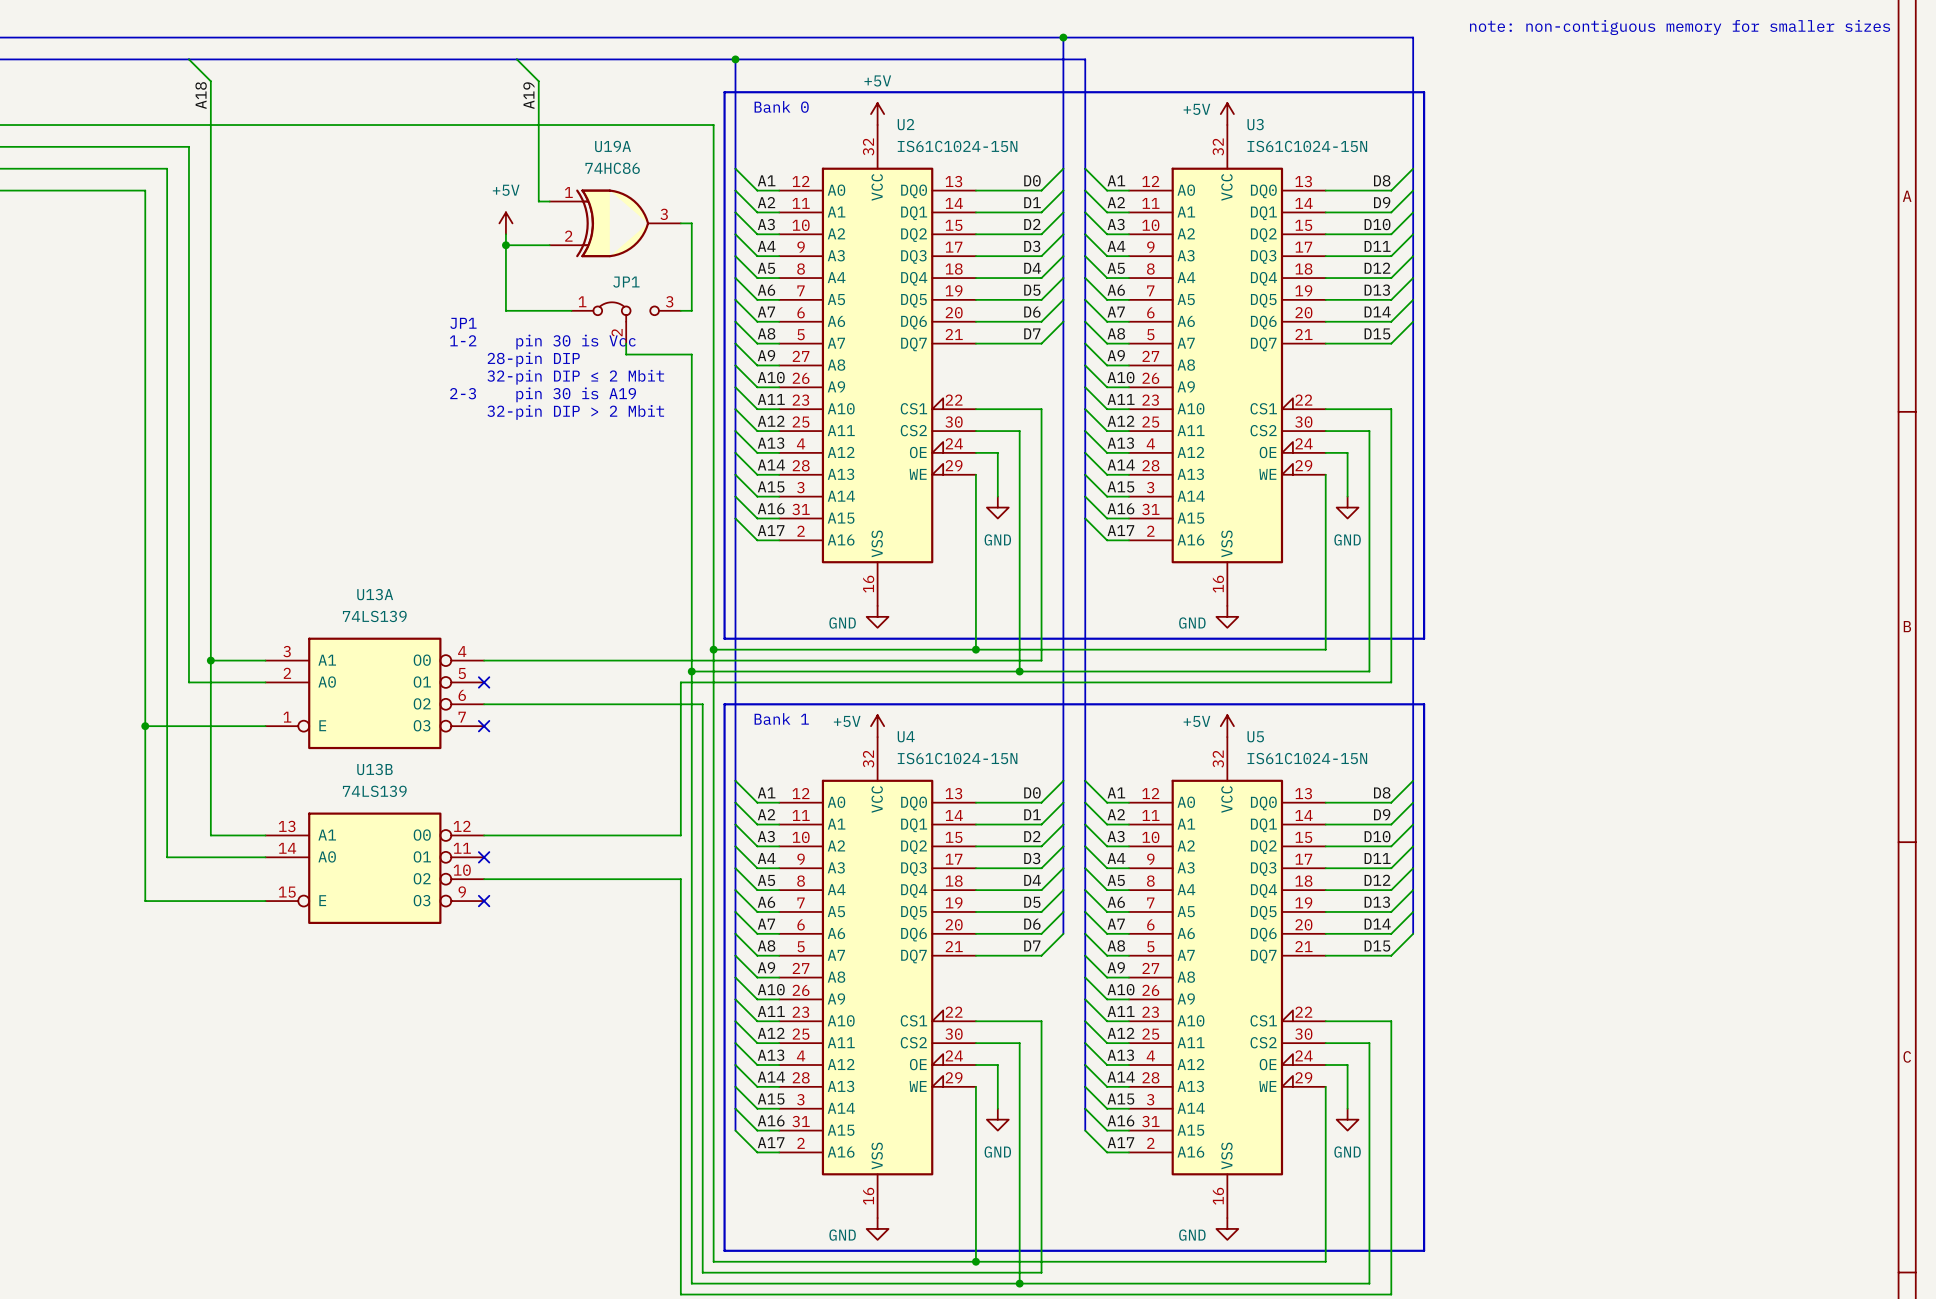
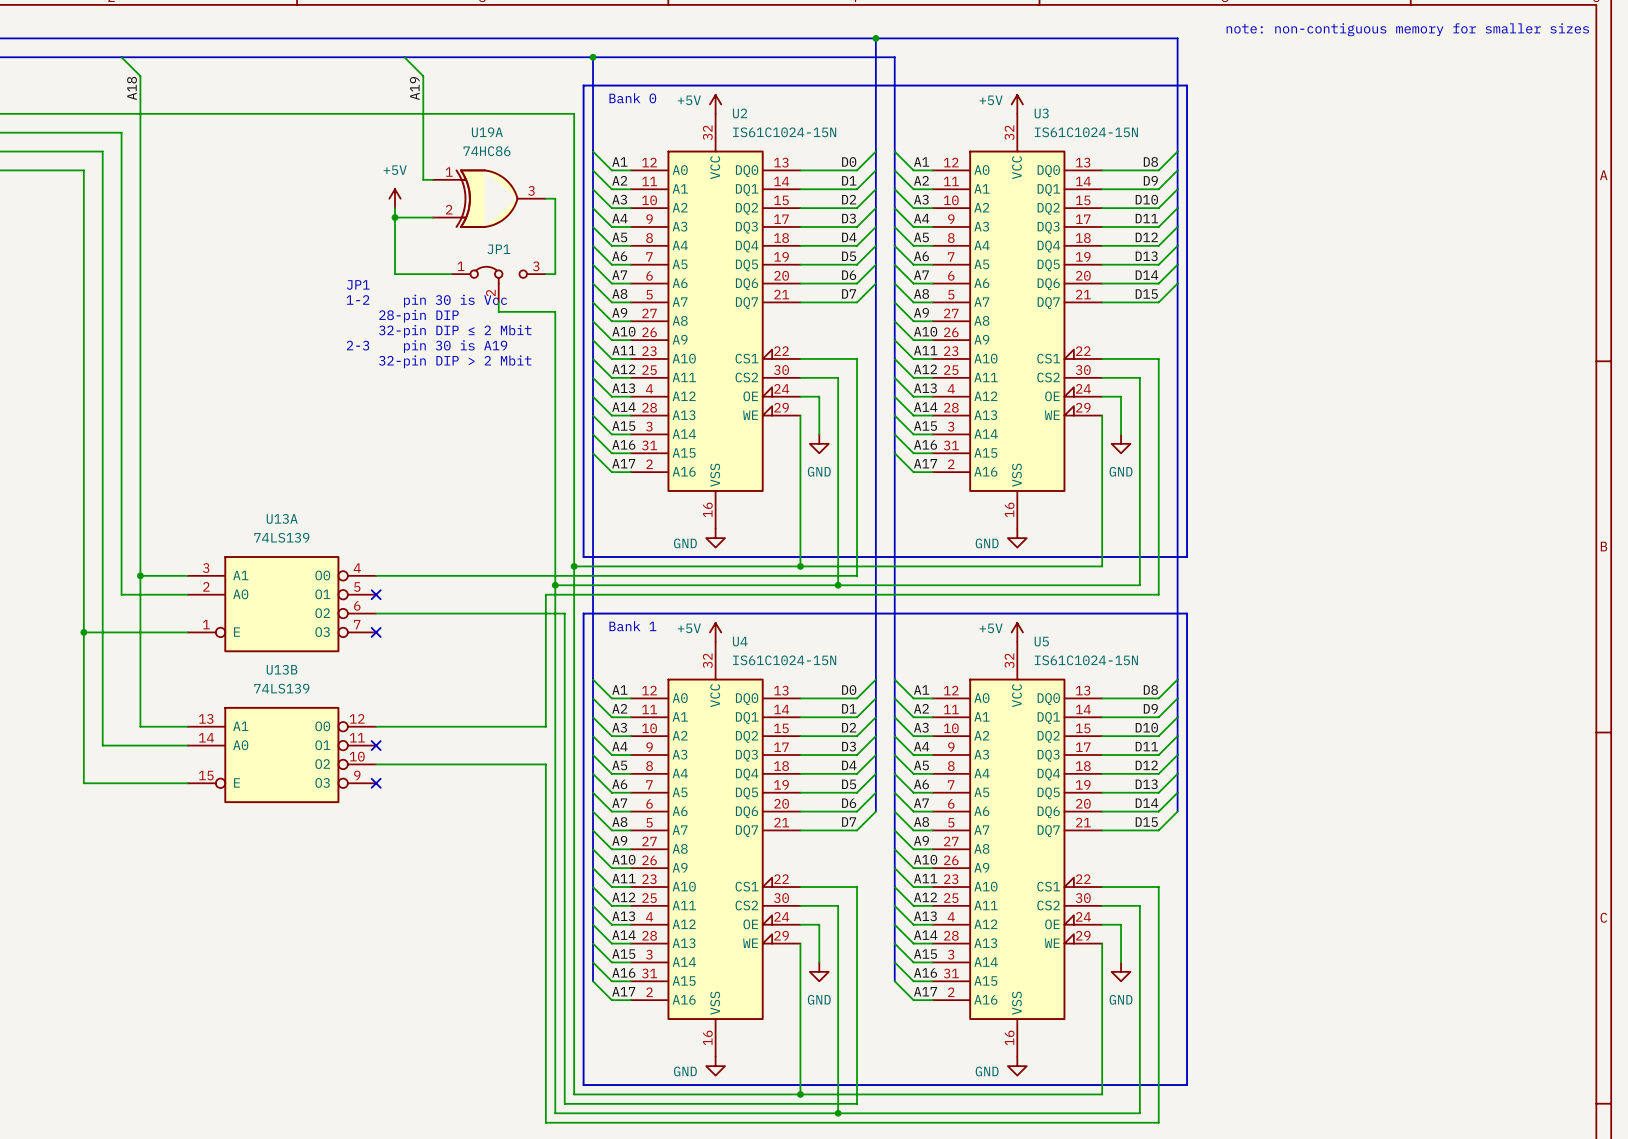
power symbol text position: +5V (877, 80) -> +5V (689, 100)

